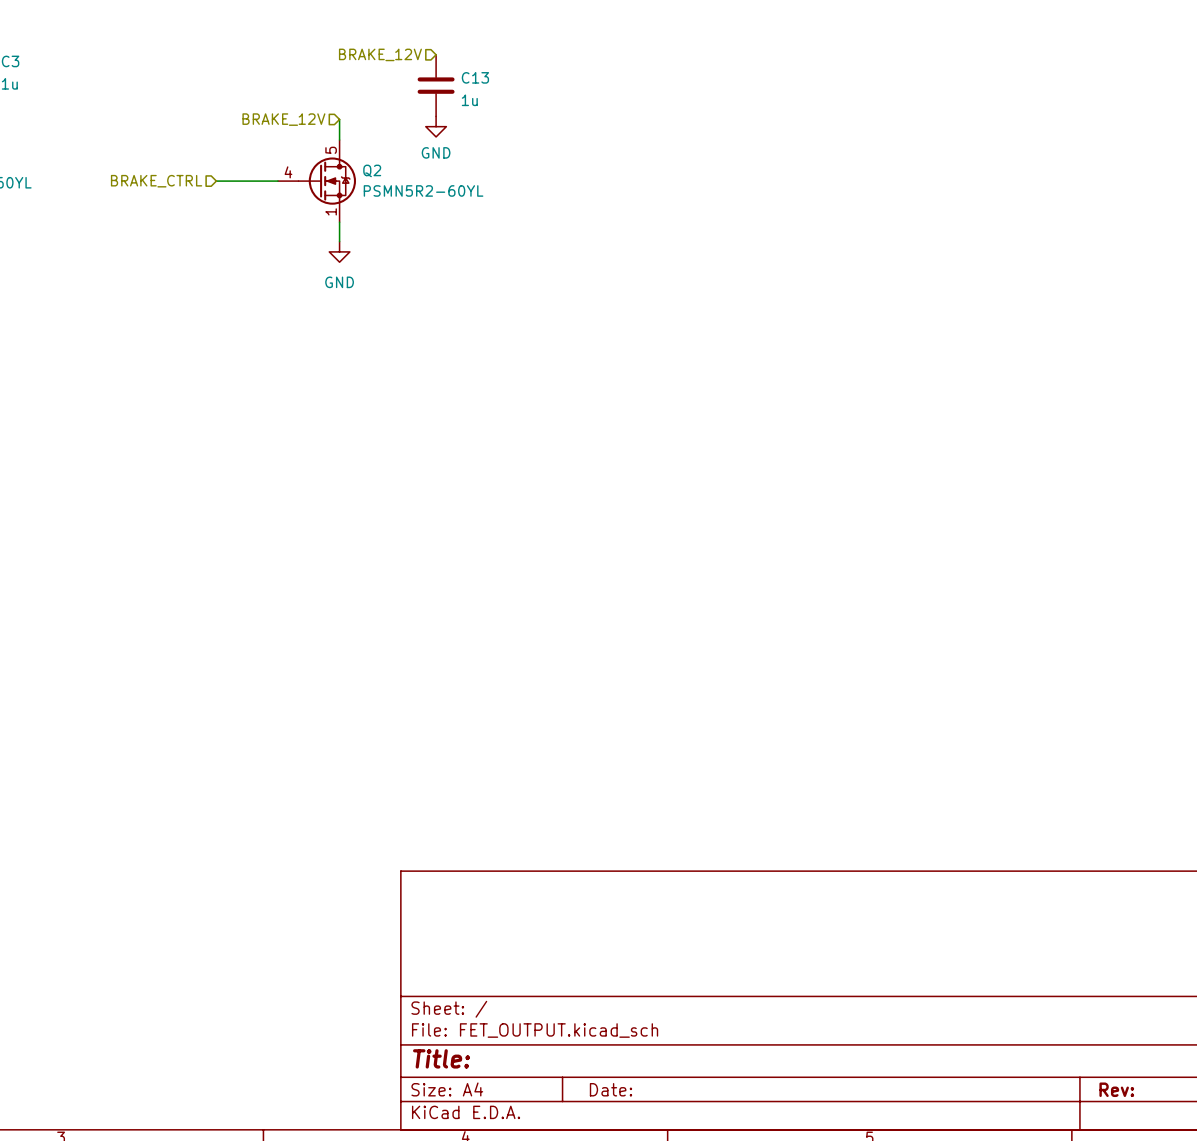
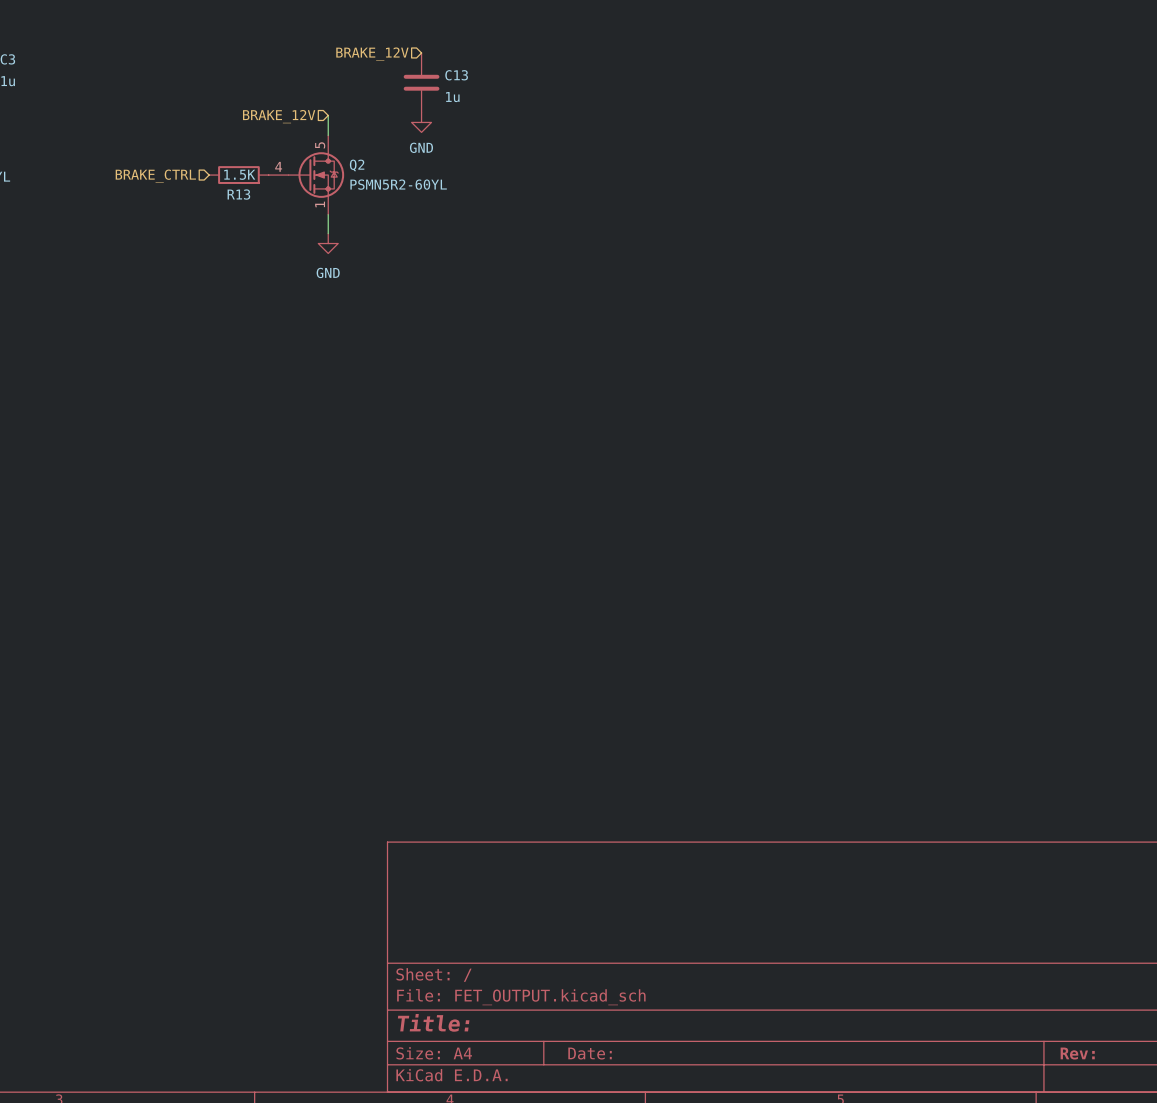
wire: (216, 181) (277, 181) -> none
R13: none -> 1.5K (238, 175)

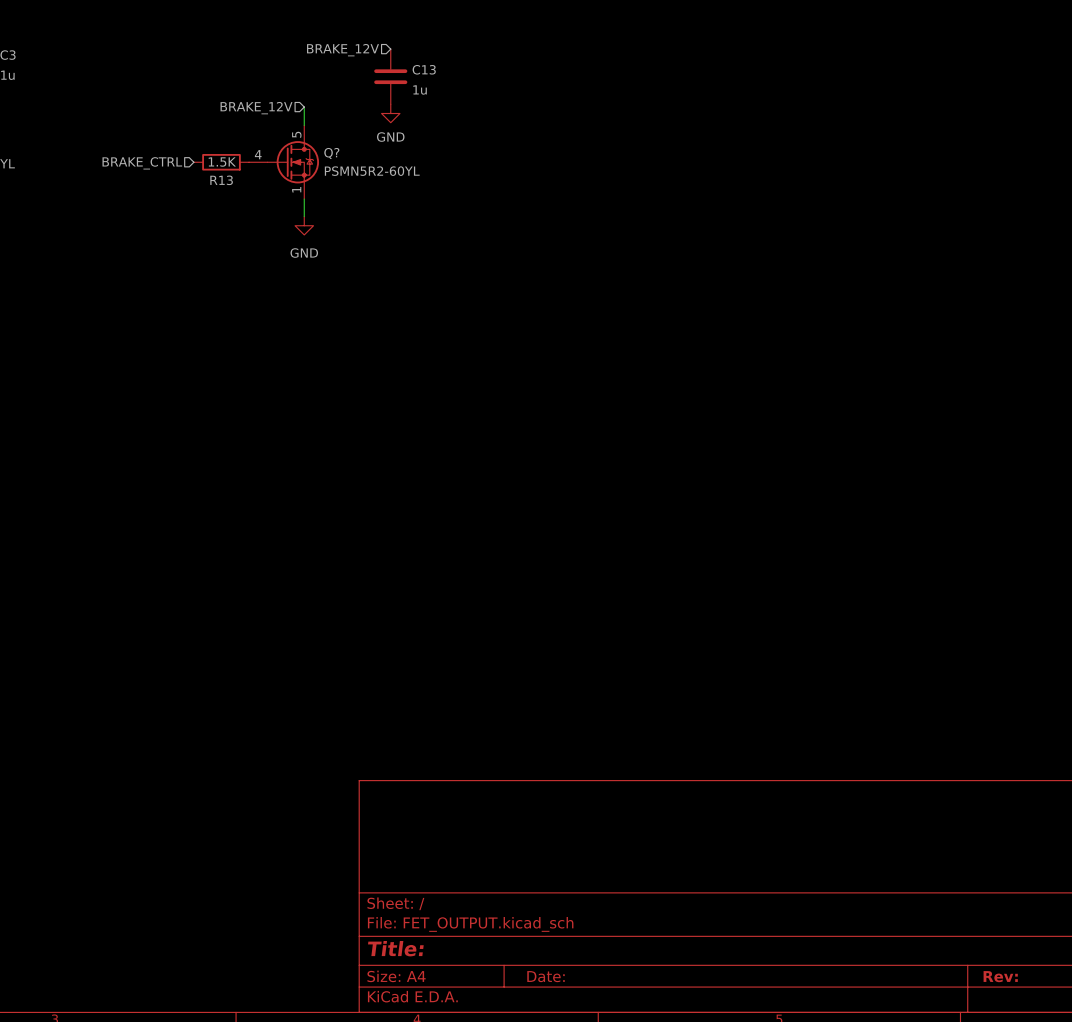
Q2 name: Q2 (357, 165) -> Q? (331, 153)

